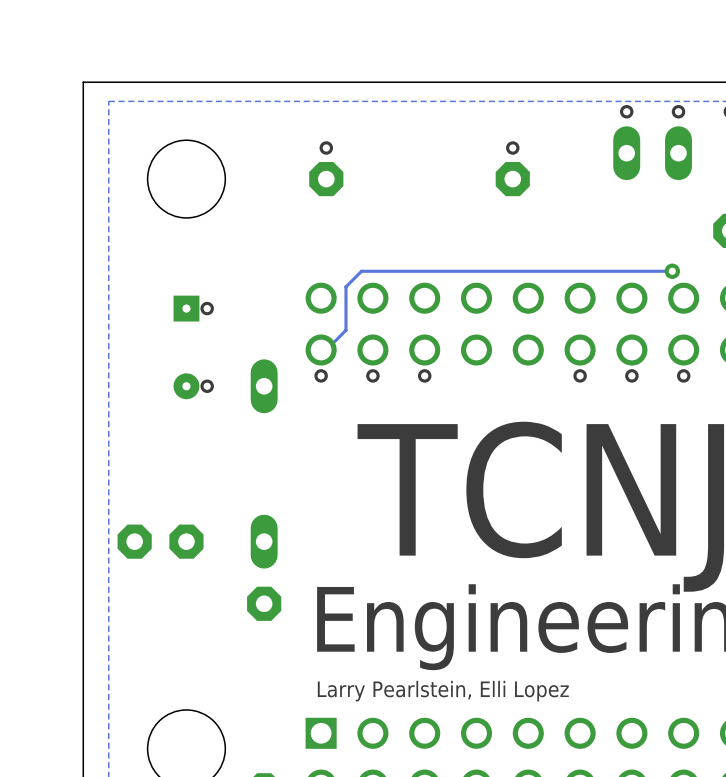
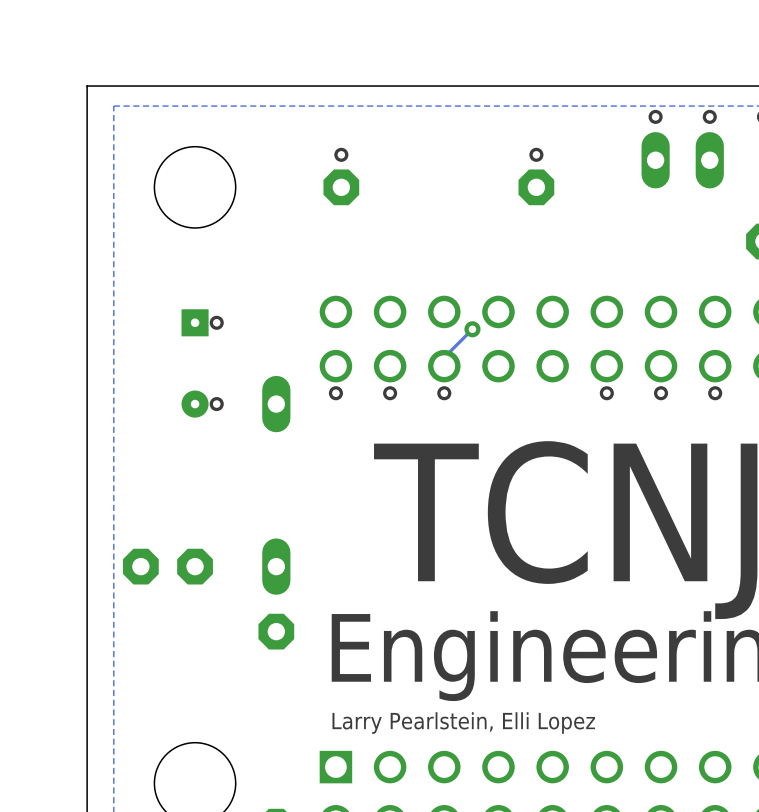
track: (672, 271) (361, 271) (345, 286) (345, 330) (327, 348) (321, 350) -> none
via: (672, 271) -> none
track: none -> (472, 329) (446, 355) (446, 365) (444, 366)
via: none -> (472, 329)

